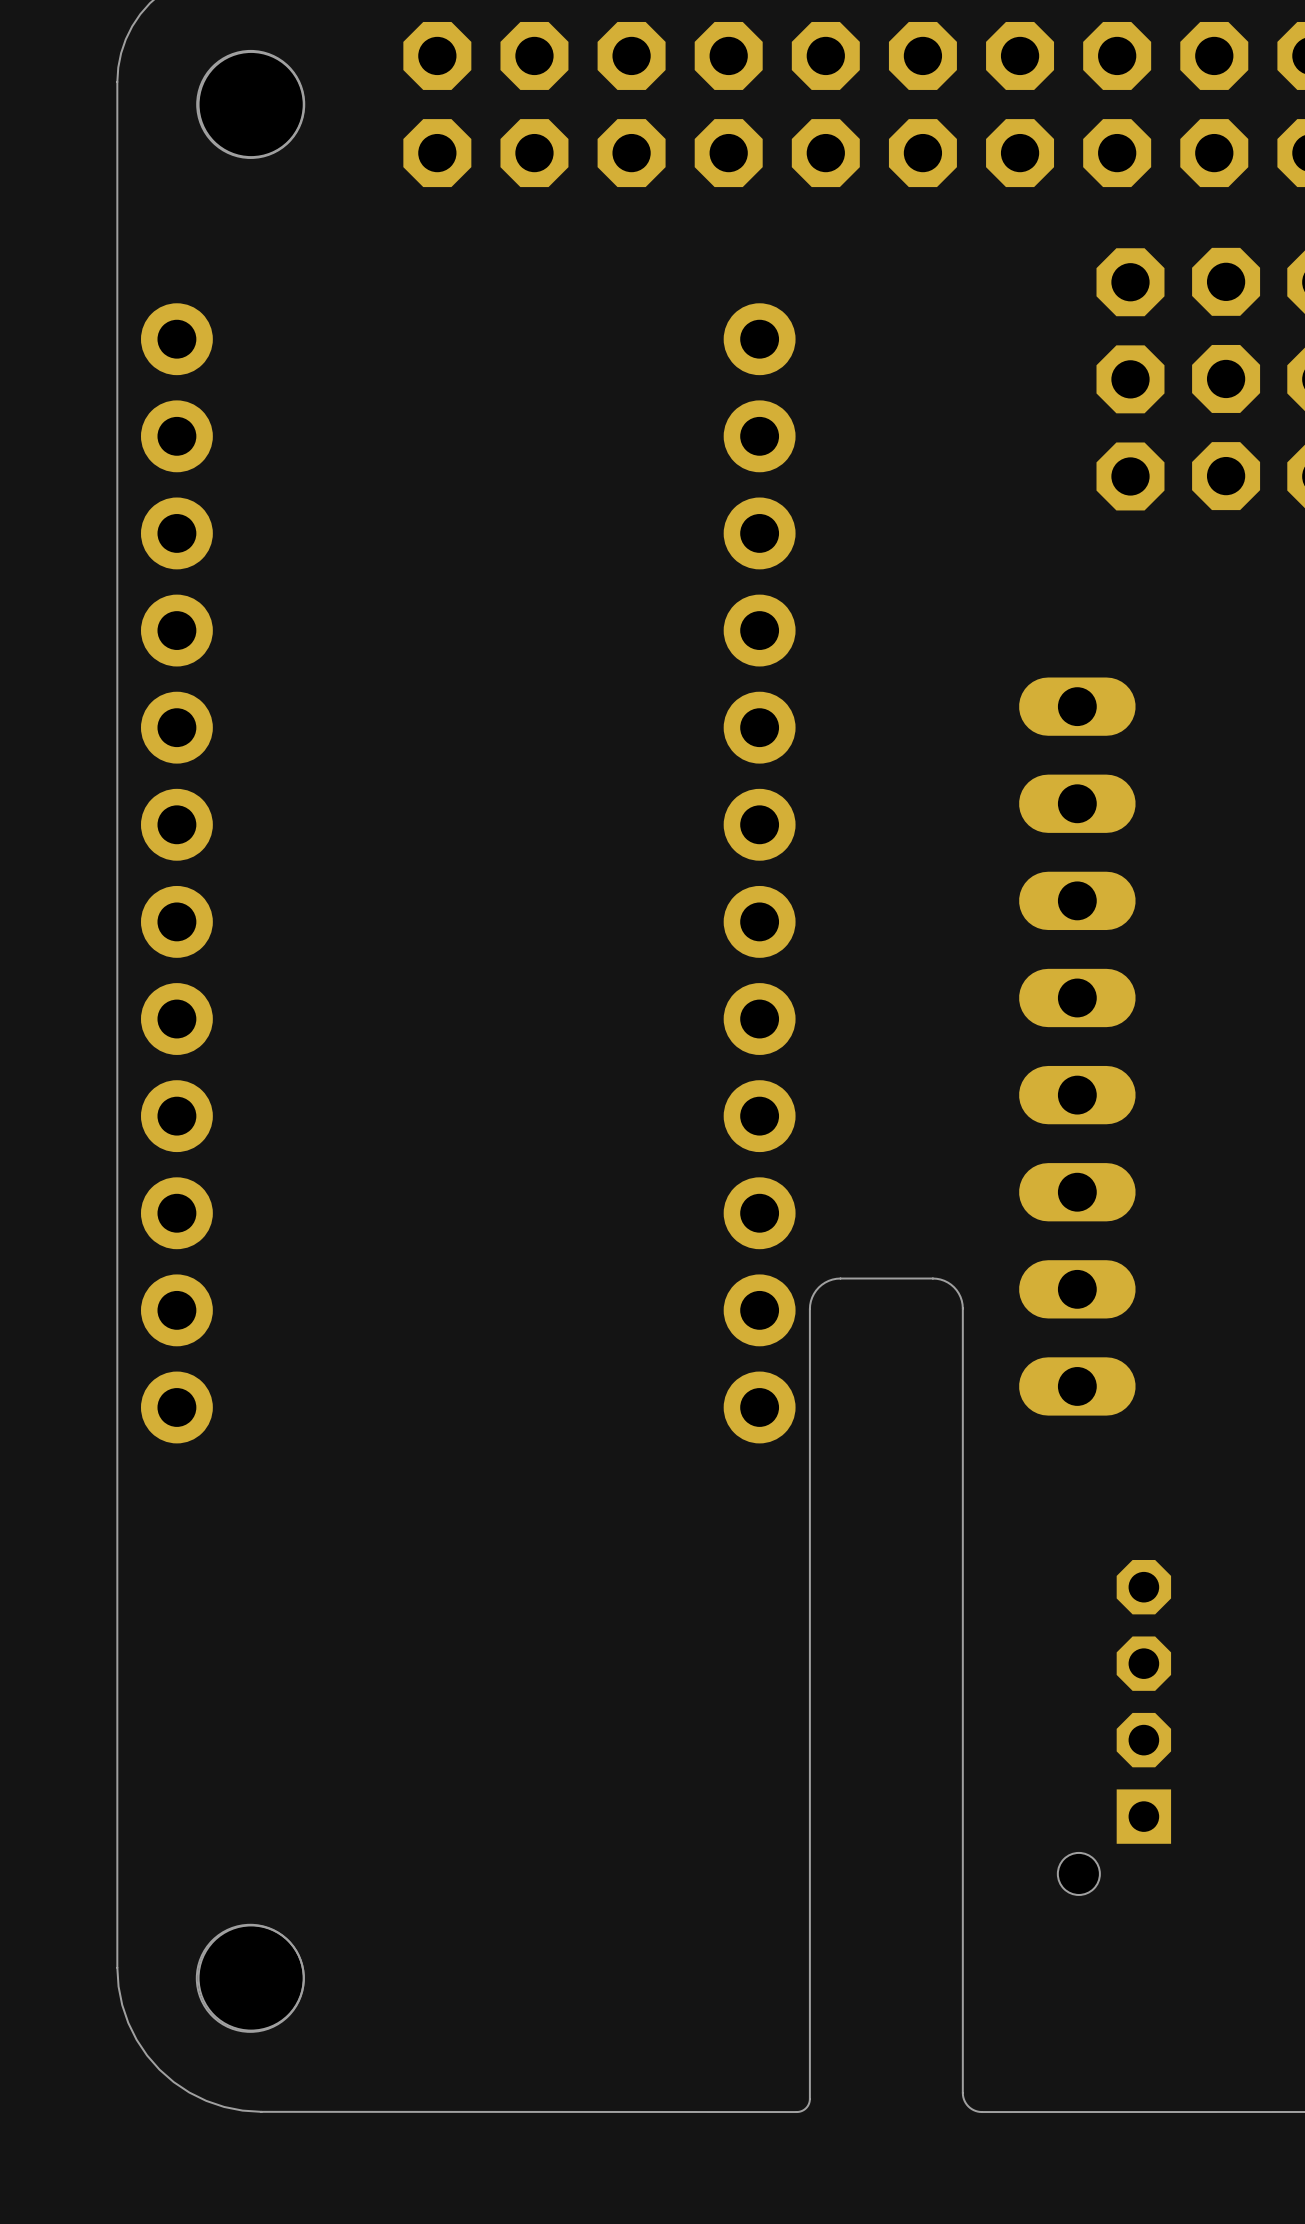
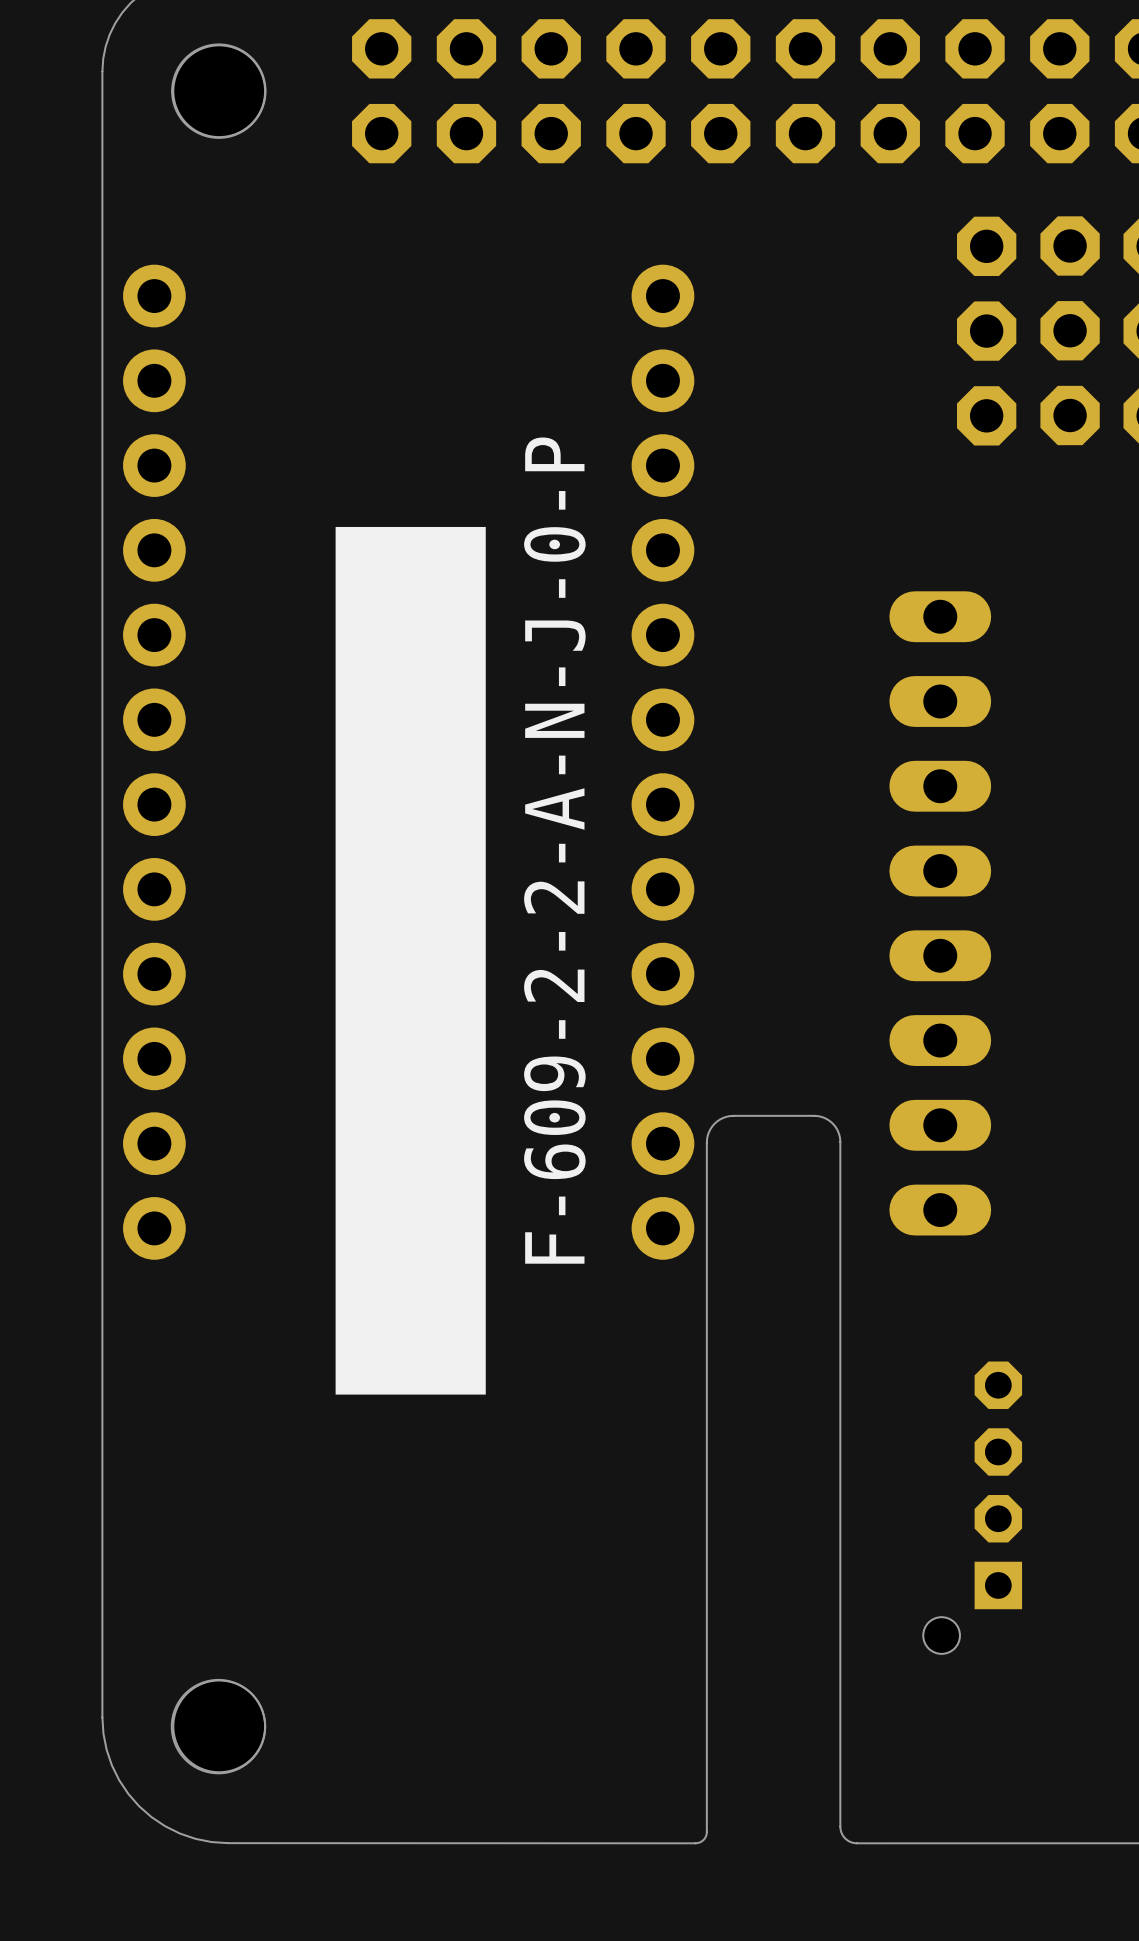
drawing: none -> [335, 526, 486, 1395]
text: none -> F-609-2-2-A-N-J-0-P (554, 850)

